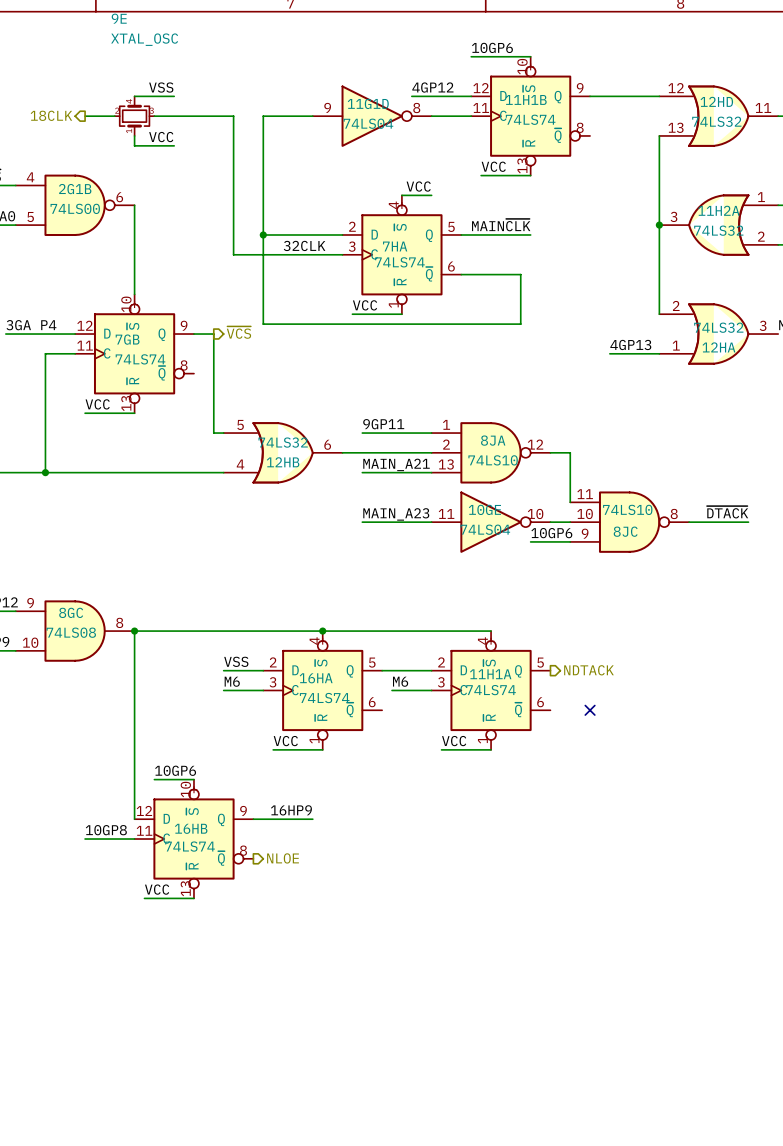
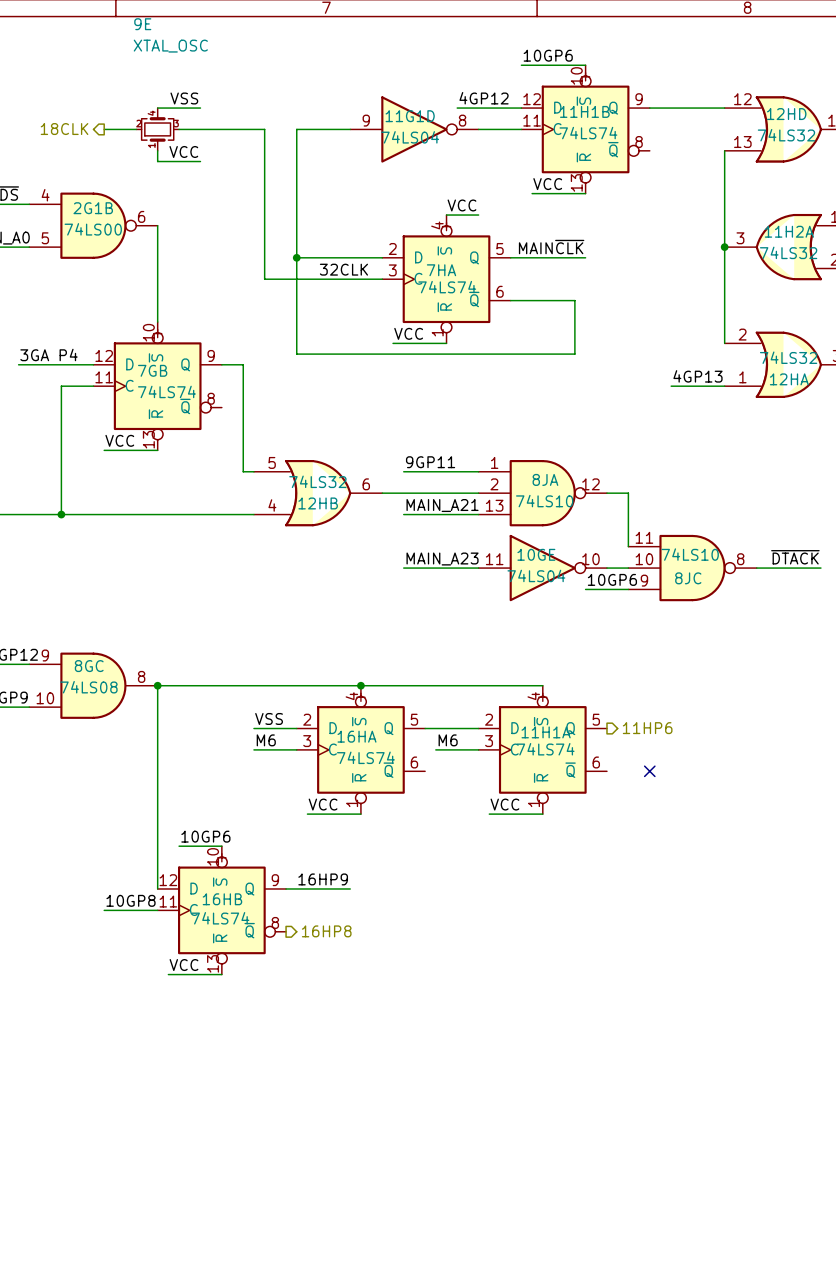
hierarchical label: ~{VCS} (238, 332) -> none
hierarchical label: NDTACK (588, 670) -> 11HP6 (647, 728)
hierarchical label: NLOE (283, 858) -> 16HP8 (326, 931)

